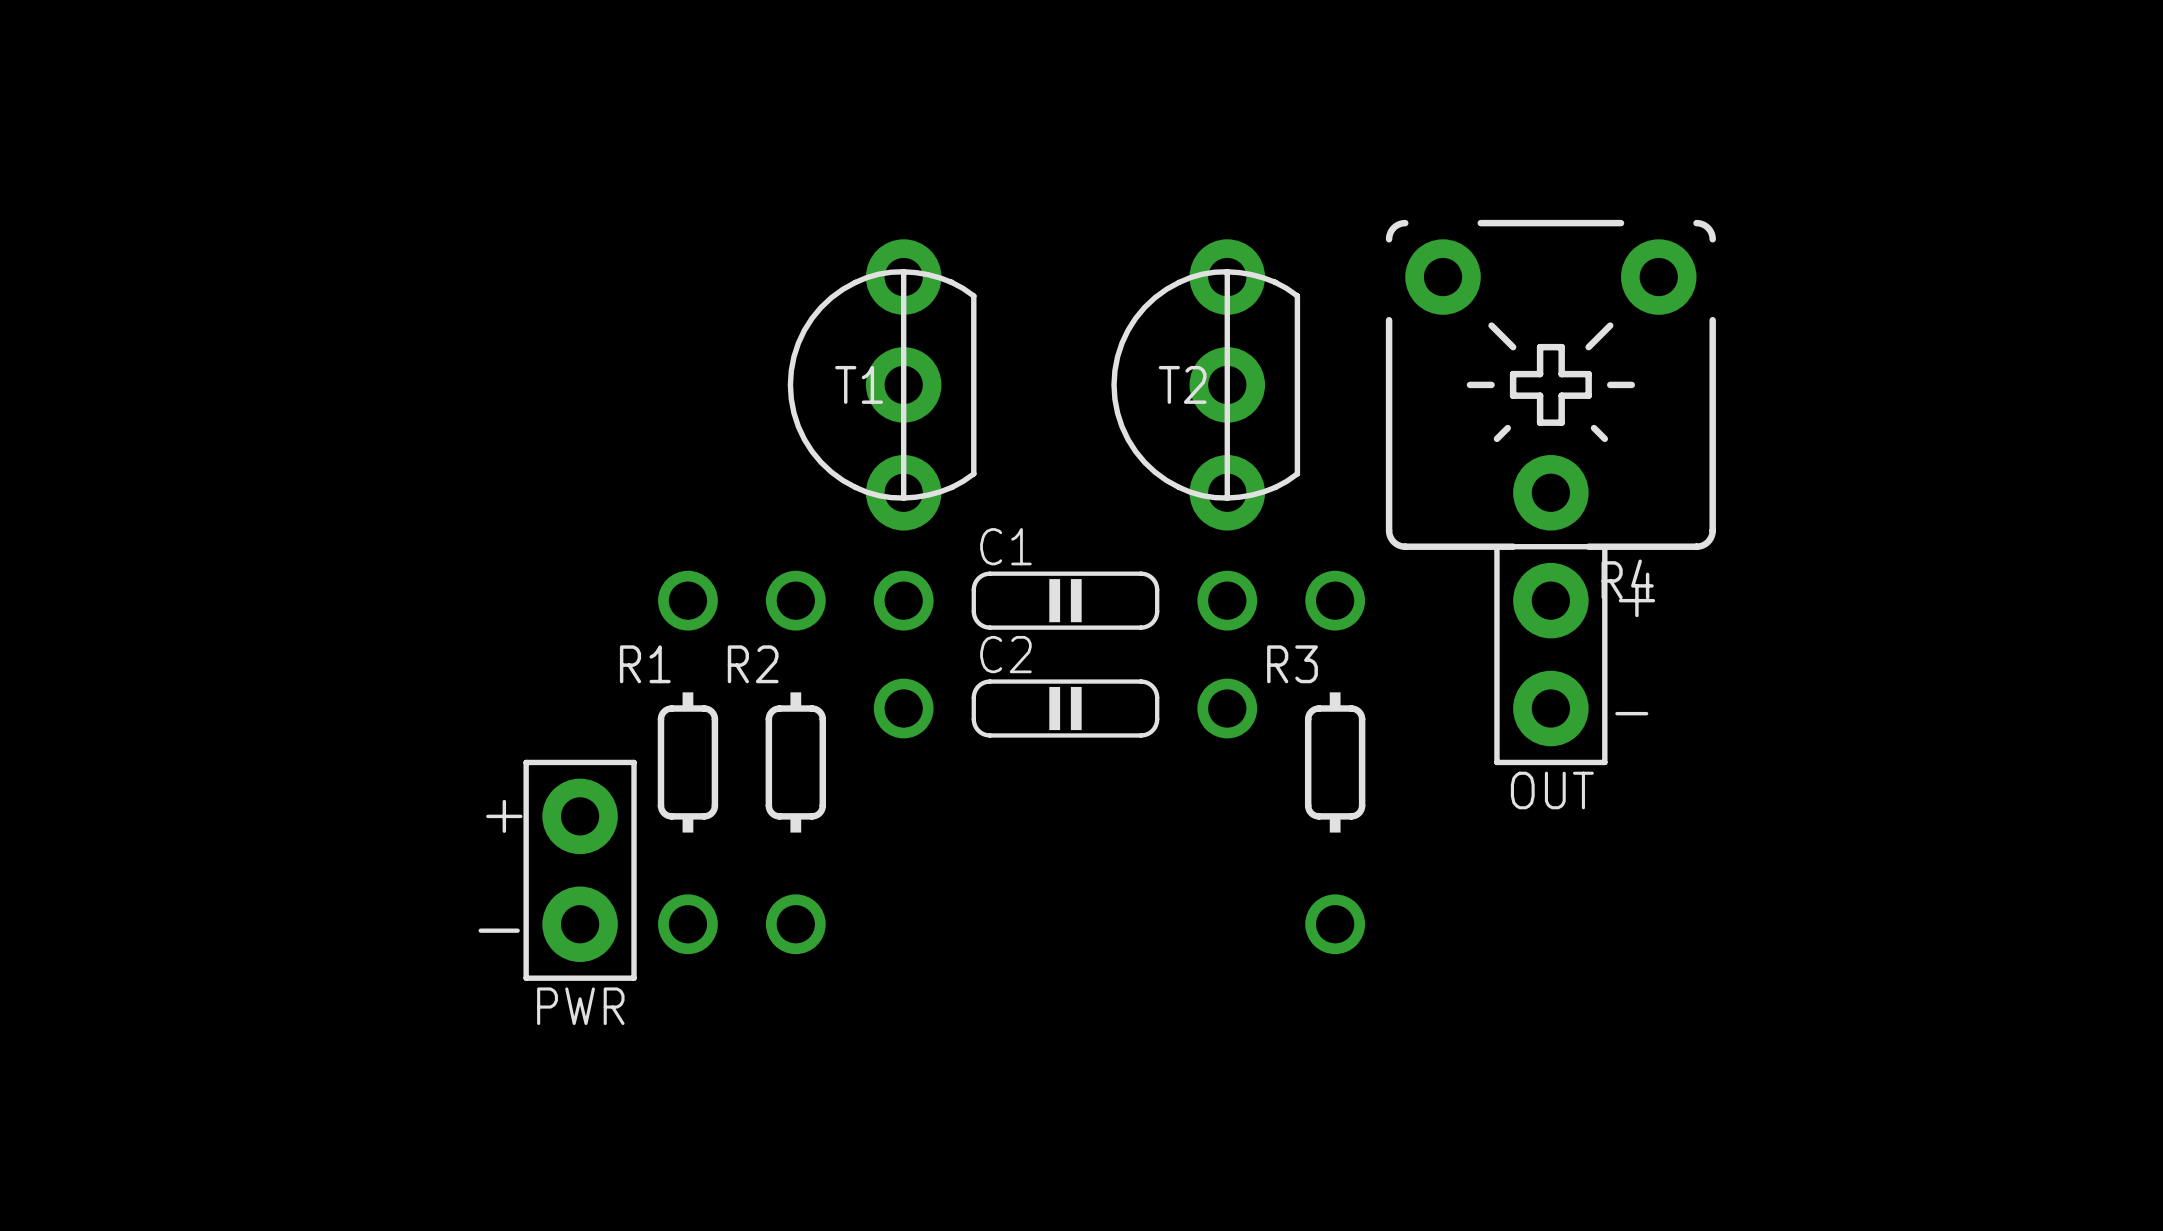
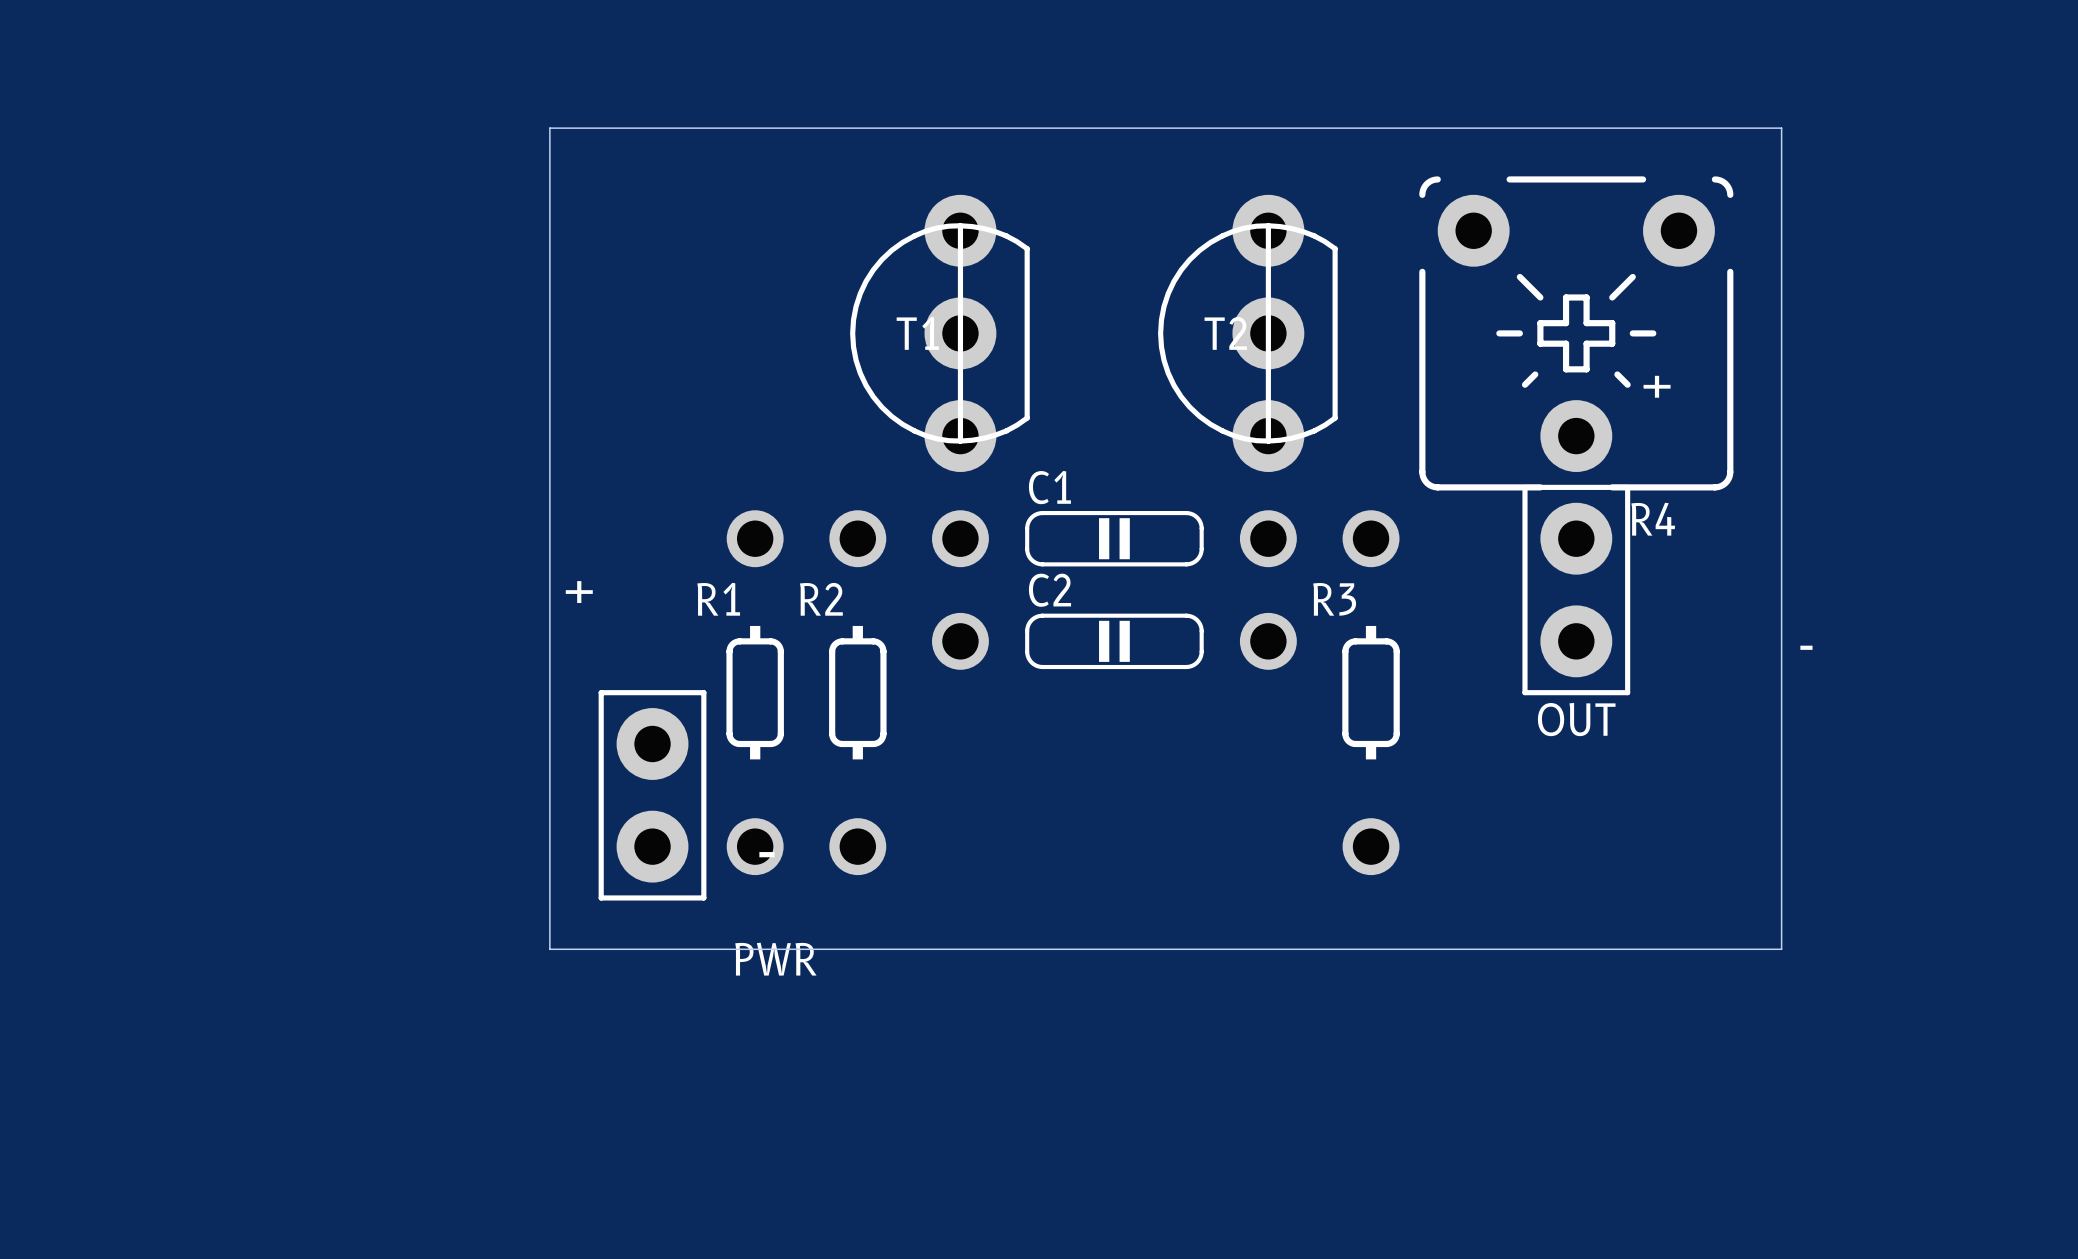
board edge: none -> (549, 128) (1781, 128) (1781, 949) (549, 949) (549, 128)
OUT footprint: [1494, 544, 1608, 766] -> [1522, 484, 1631, 696]
part footprint: [523, 759, 637, 981] -> [598, 690, 707, 901]

